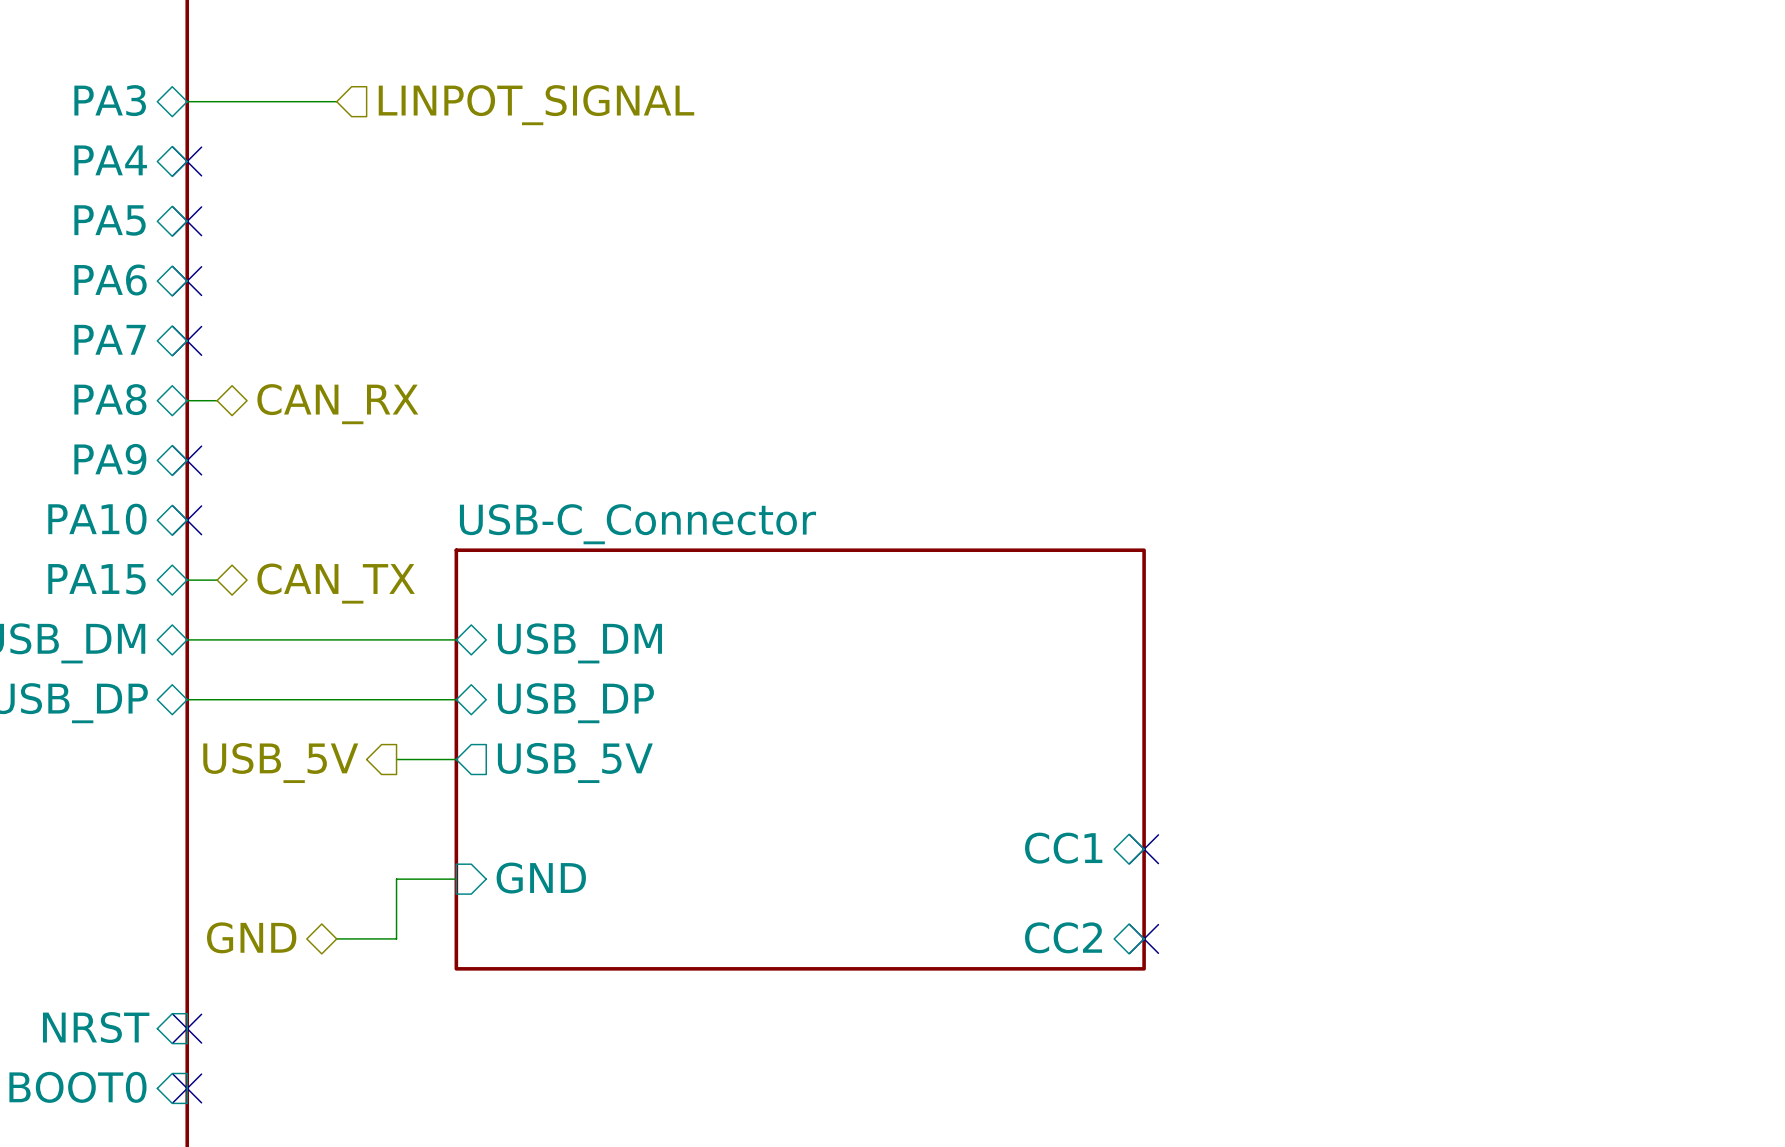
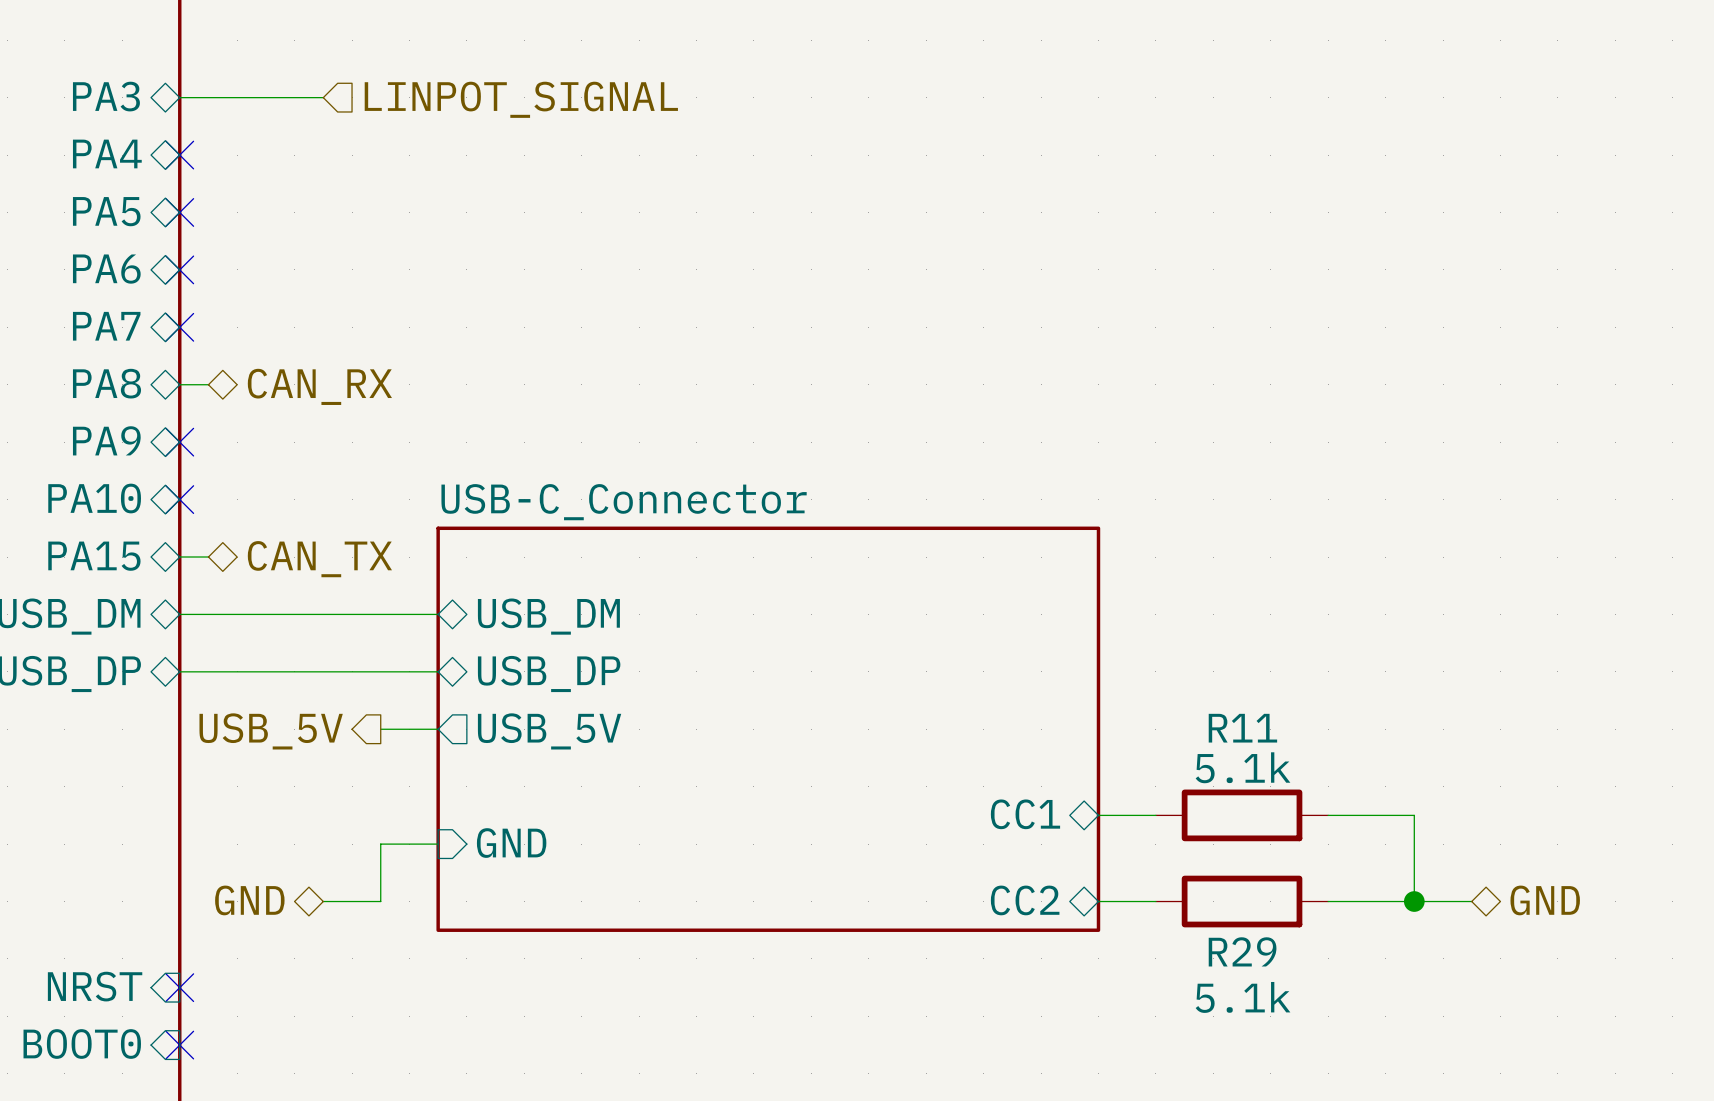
wire: none -> (1098, 815) (1155, 815)
no-connect mark: (1144, 849) -> none
R11: none -> 5.1k (1242, 815)
wire: none -> (1328, 815) (1414, 815) (1414, 901)
hierarchical label: none -> GND (1545, 900)
wire: none -> (1098, 901) (1155, 901)
no-connect mark: (1144, 938) -> none
R29: none -> 5.1k (1242, 901)
wire: none -> (1328, 901) (1471, 901)
junction: none -> (1414, 901)

